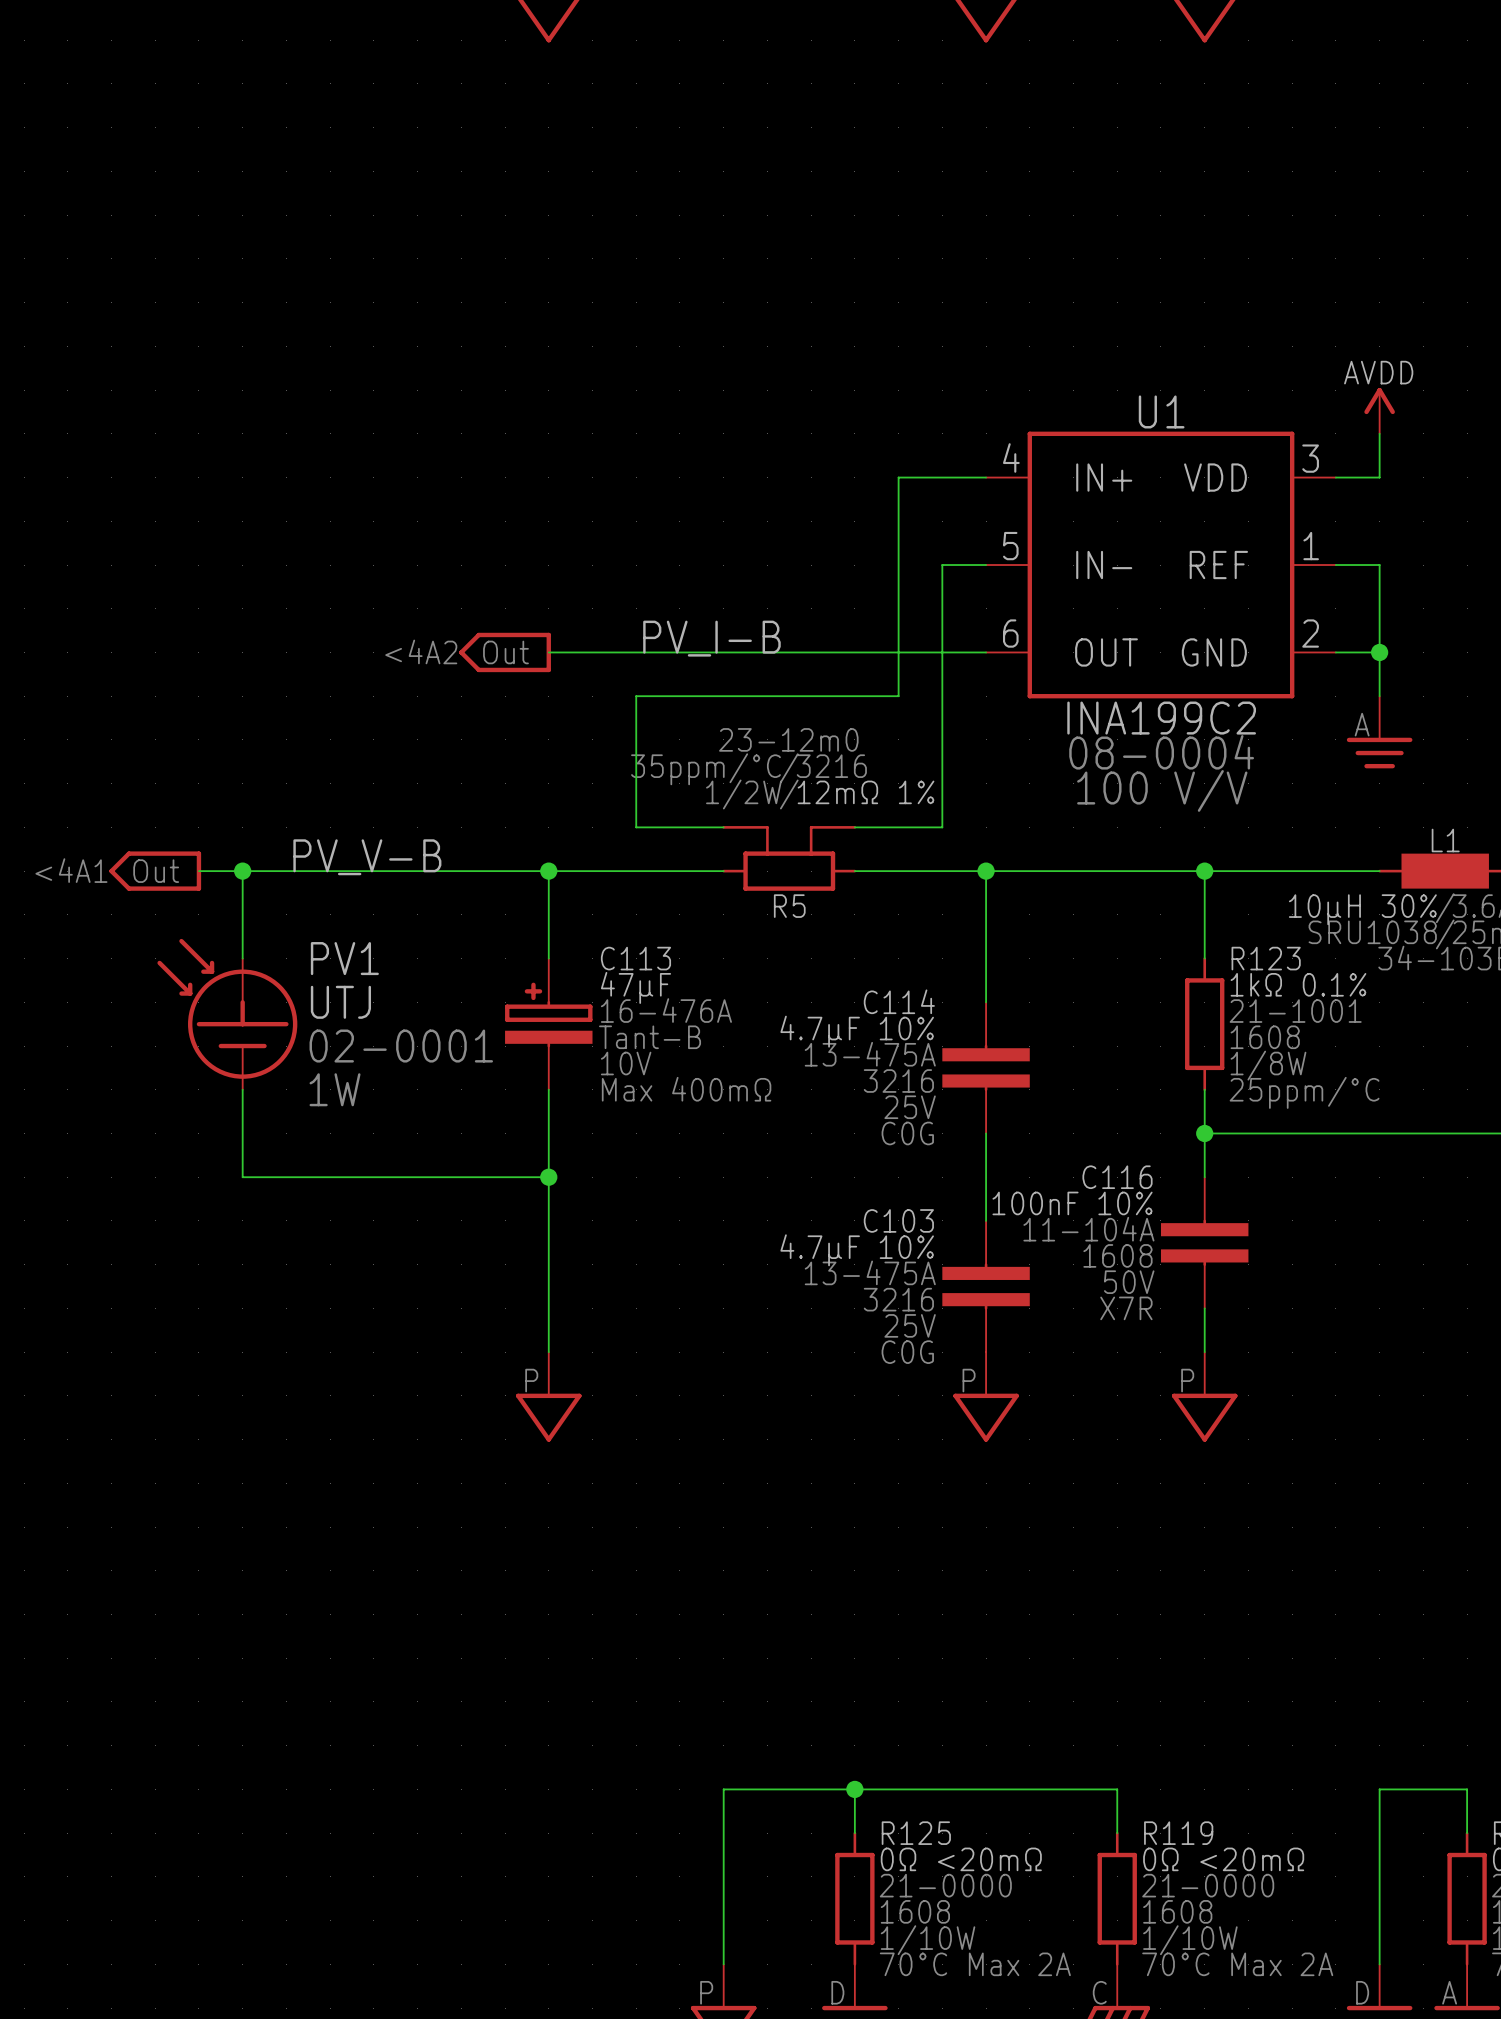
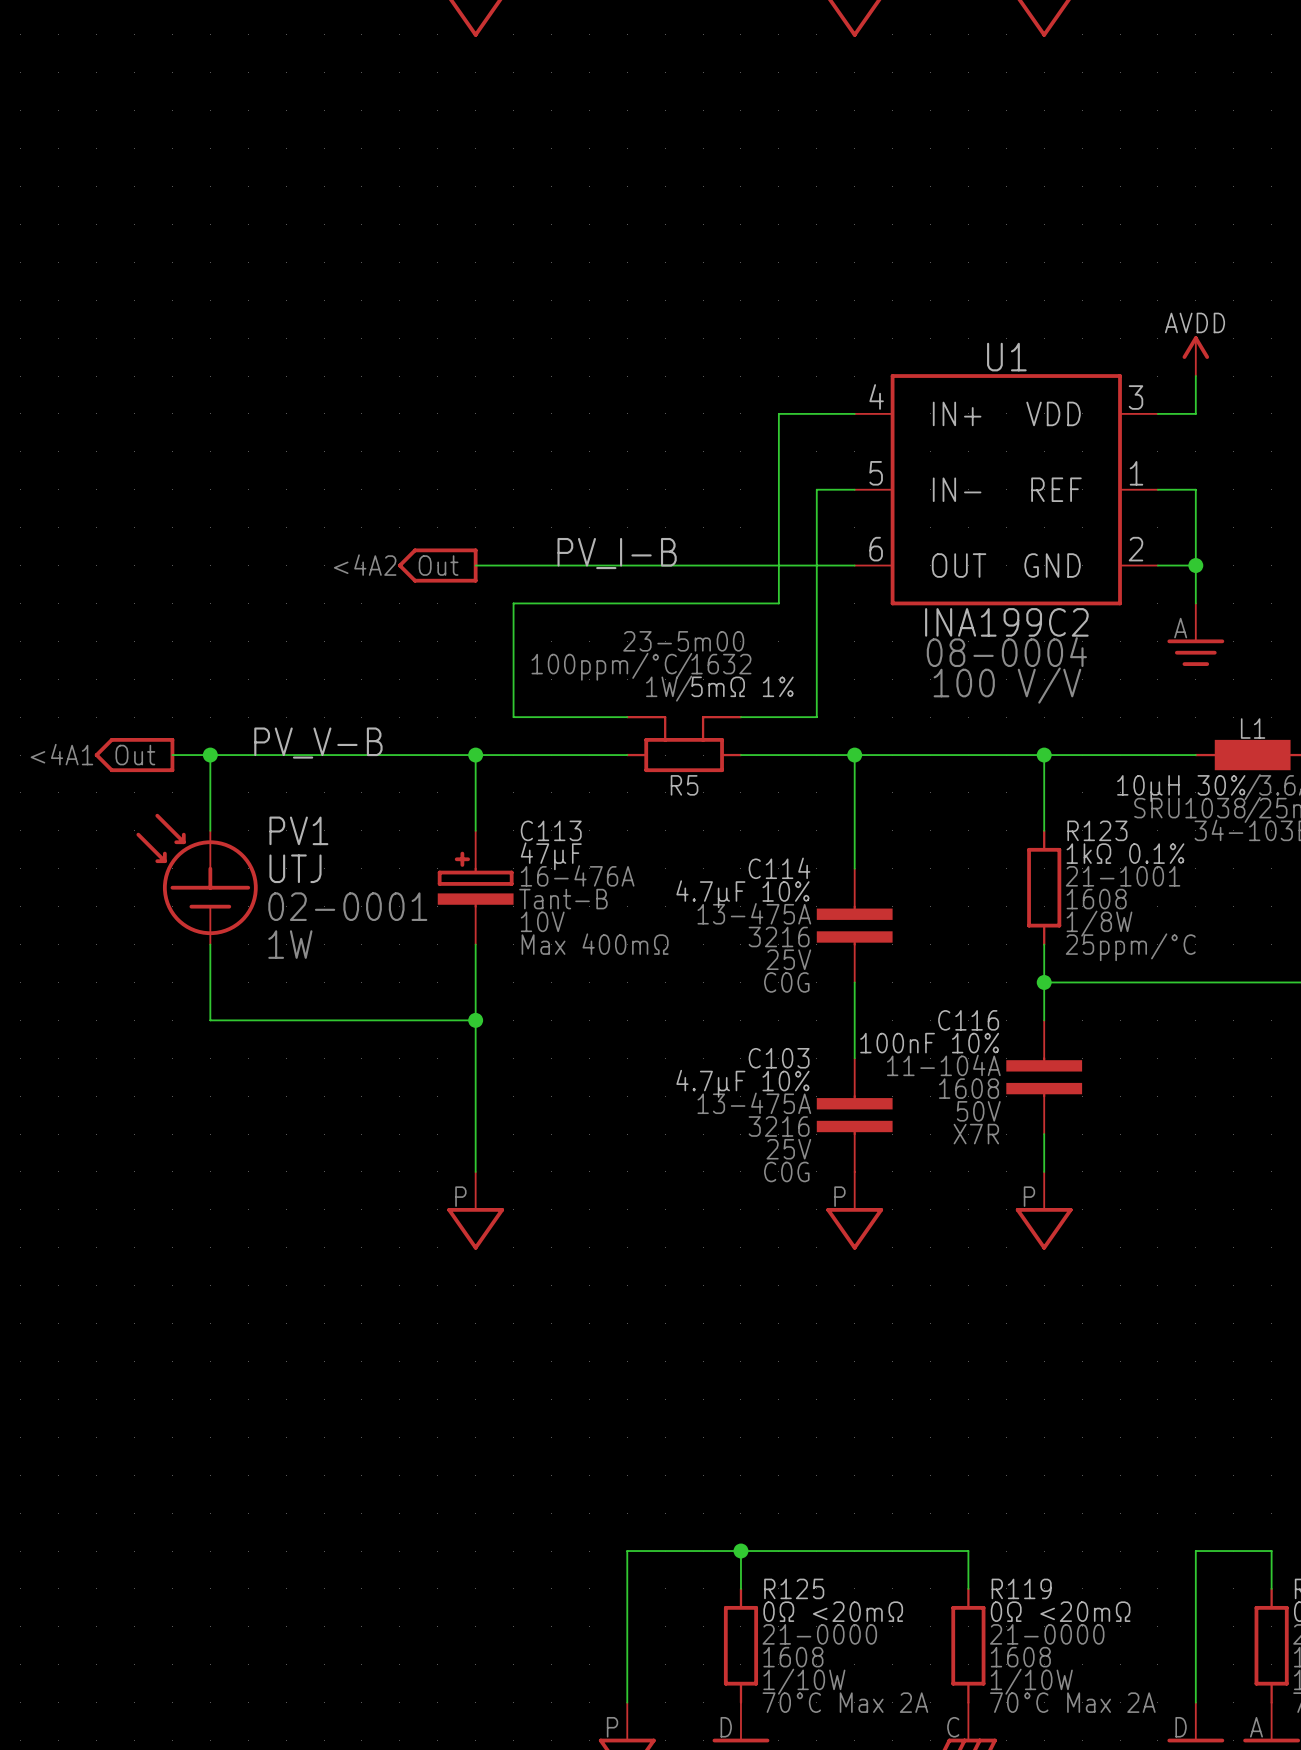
wire: (636, 696) (636, 827) -> (551, 603) (513, 603) (513, 717) (551, 717)
R5 text: 23-12m0 (788, 739) -> 23-5m00 (683, 641)
R5 text: 3216 (831, 766) -> 1632 (721, 664)
R5 text: 35ppm/°C (705, 769) -> 100ppm/°C (604, 666)
R5 value: 12mΩ 1% (866, 792) -> 5mΩ 1% (742, 686)
R5 text: 1/2W (743, 794) -> 1W (661, 686)

